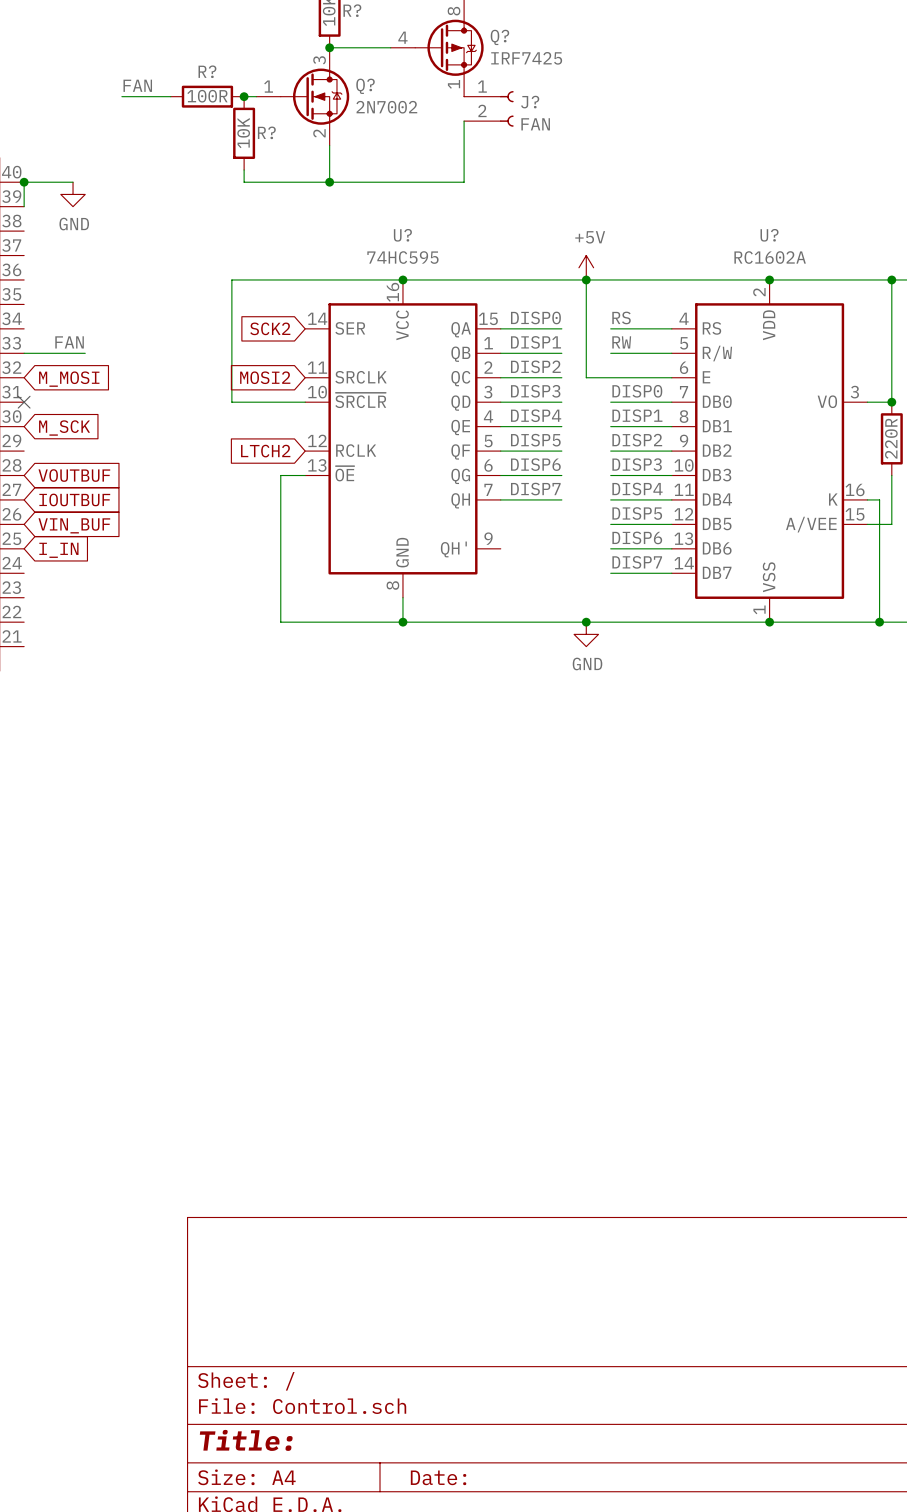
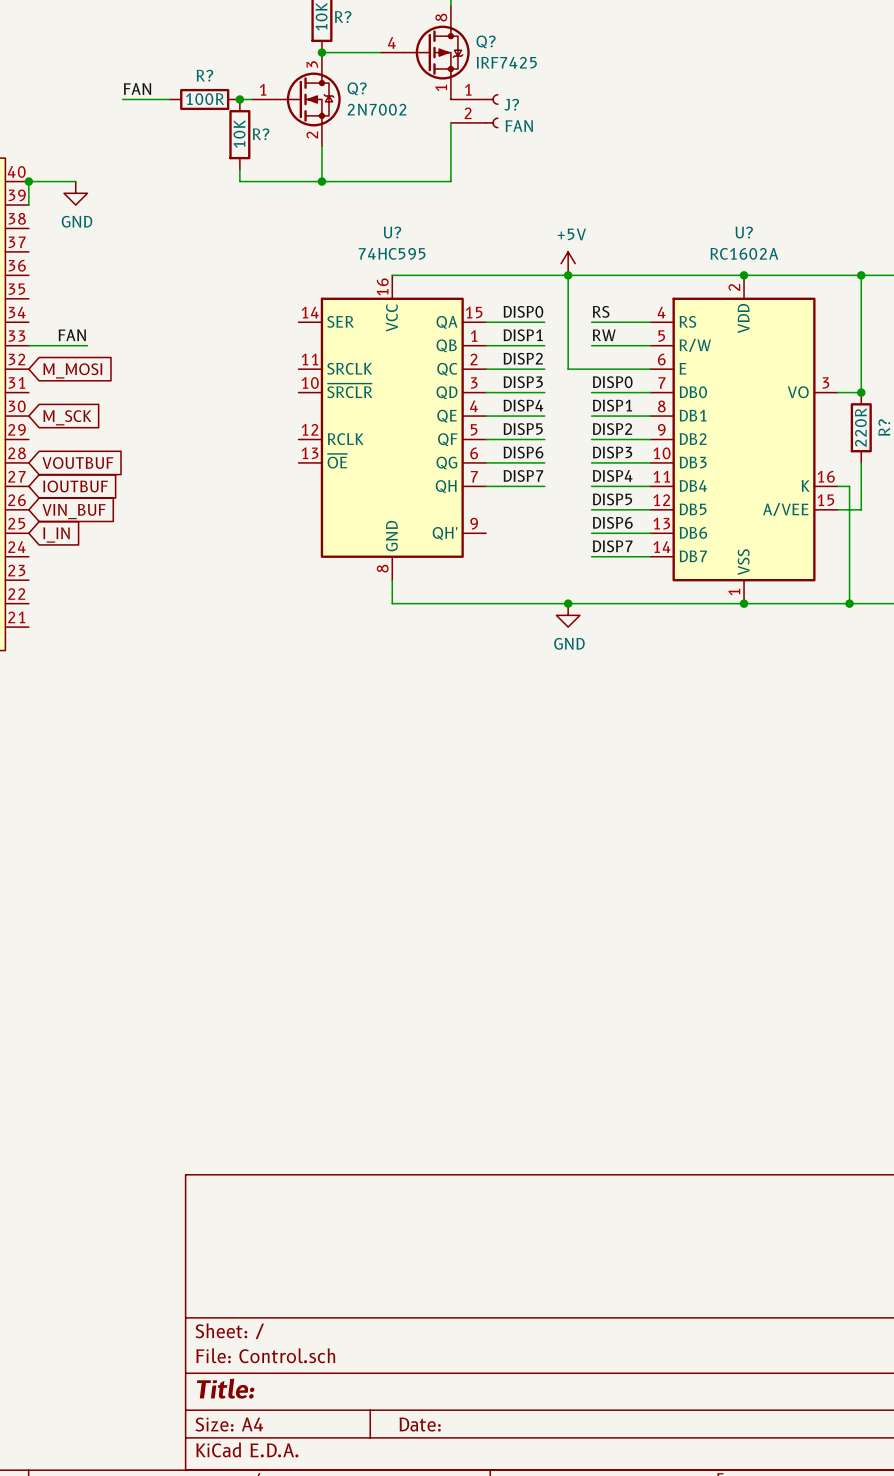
wire: (402, 279) (231, 279) (231, 402) (305, 402) -> none
junction: (402, 279) -> none
global label: SCK2 (270, 328) -> none
global label: MOSI2 (265, 377) -> none
no-connect mark: (24, 402) -> none
global label: LTCH2 (265, 451) -> none
wire: (305, 475) (280, 475) (280, 622) (402, 622) -> none
junction: (402, 622) -> none

